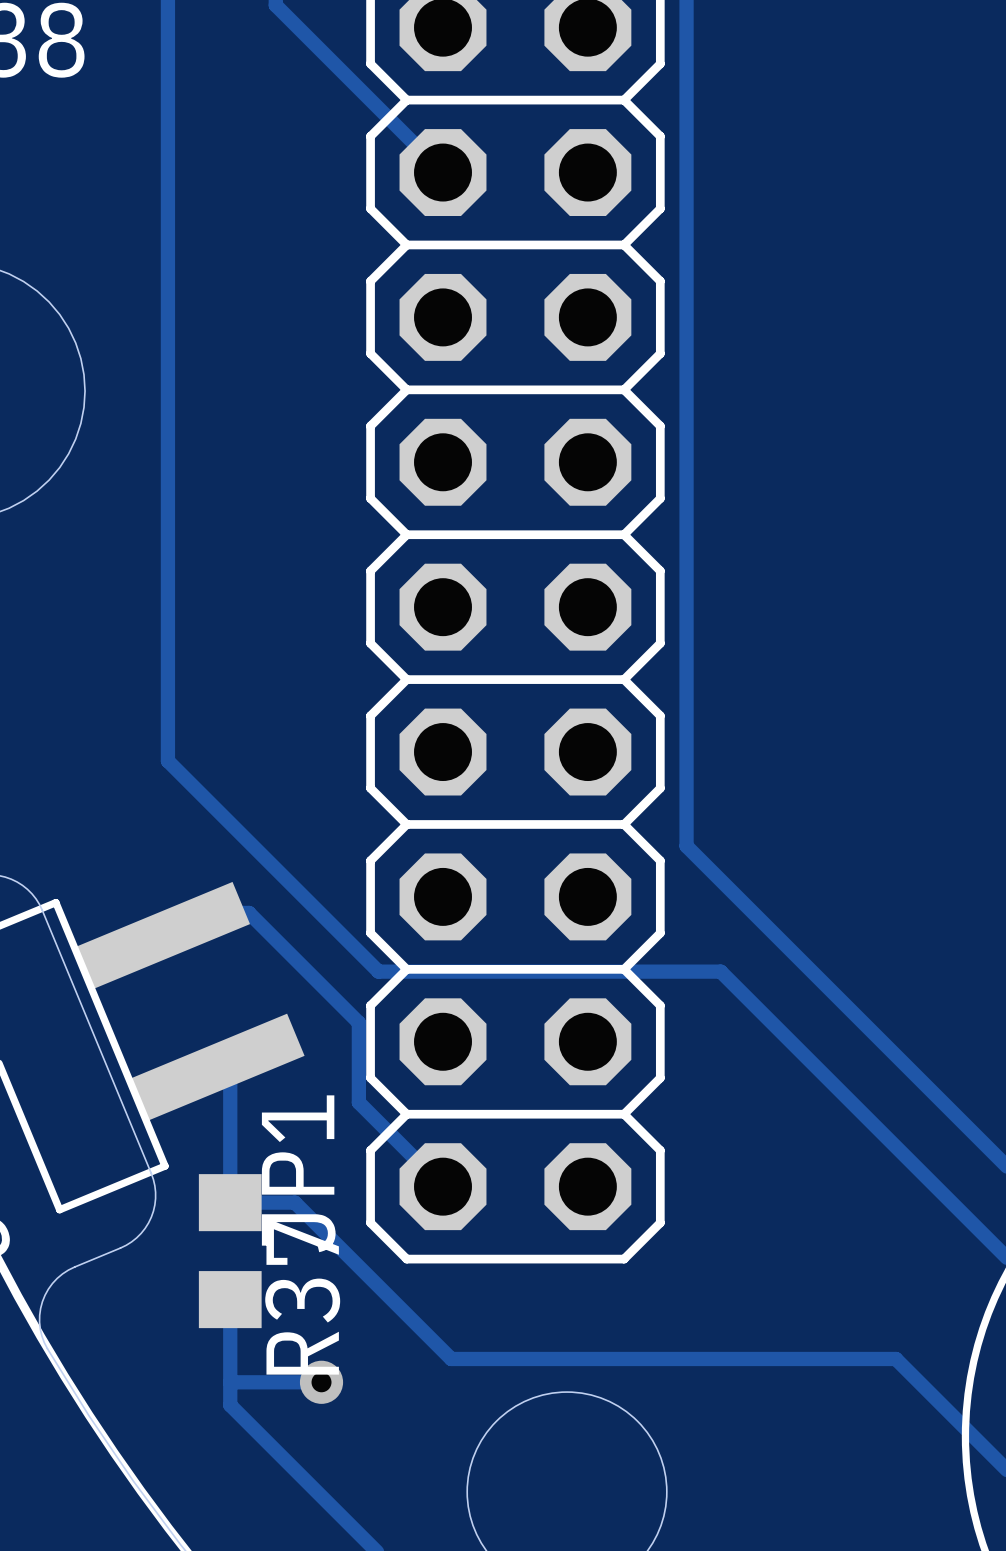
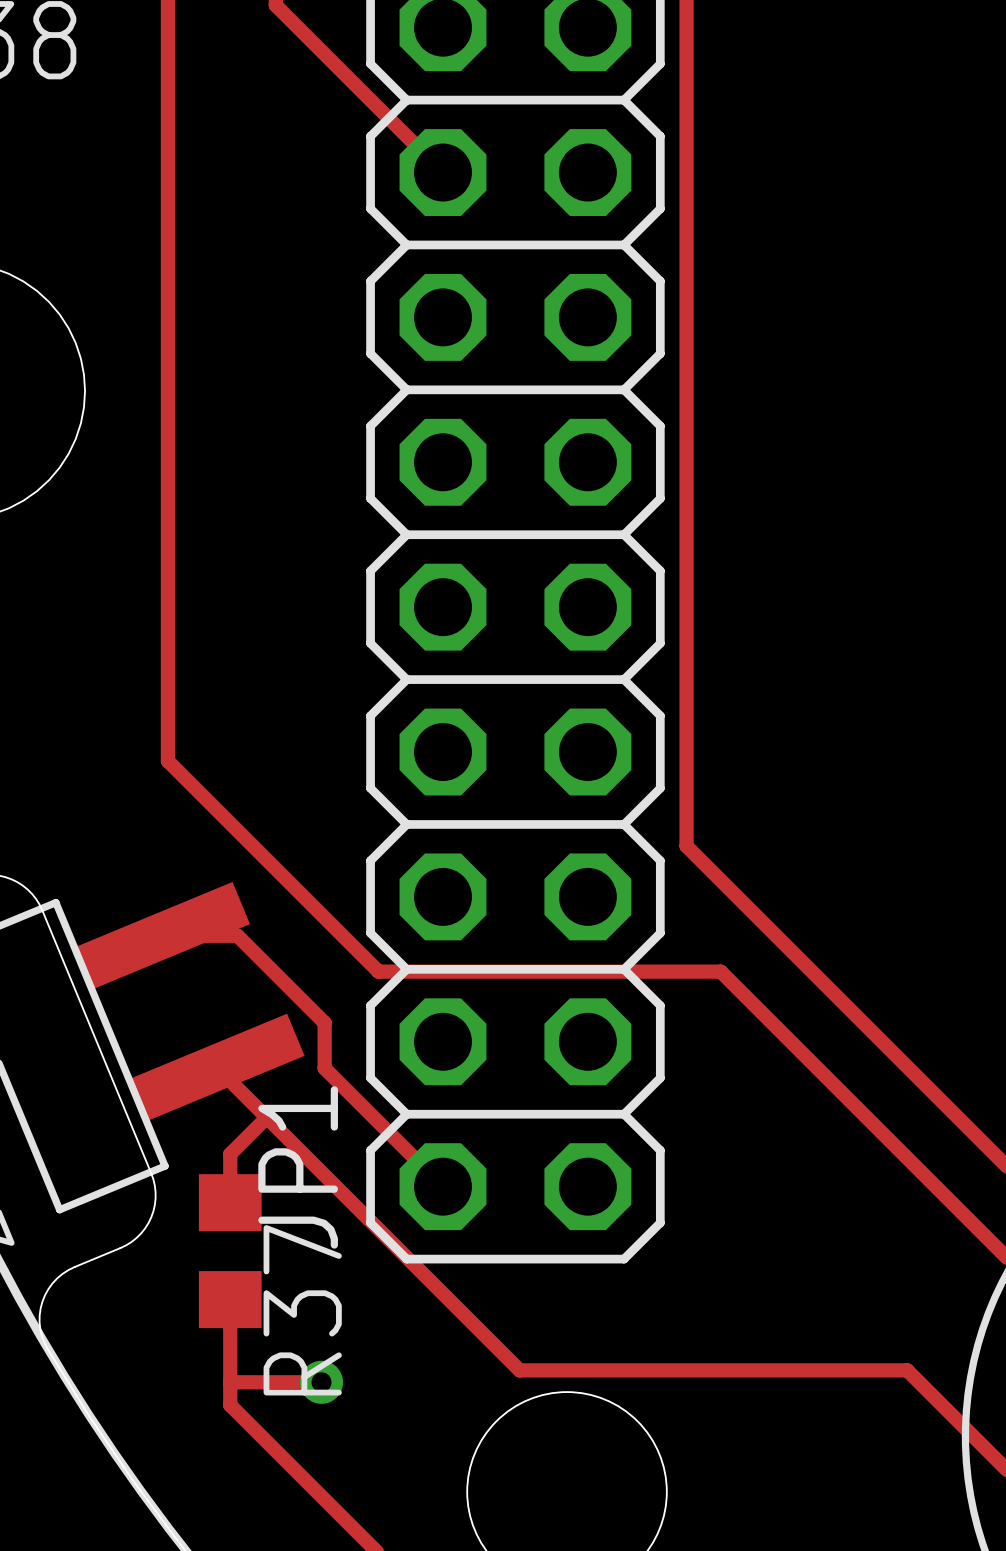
track: (162, 935) (185, 912) (248, 912) (358, 1022) (358, 1102) -> (162, 935) (237, 935) (324, 1022) (324, 1068) (358, 1102)
track: (230, 1080) (230, 1154) -> (266, 1117) (230, 1154)
track: (230, 1202) (294, 1202) (451, 1358) (895, 1358) (907, 1370) -> (230, 1080) (519, 1370) (907, 1370)

